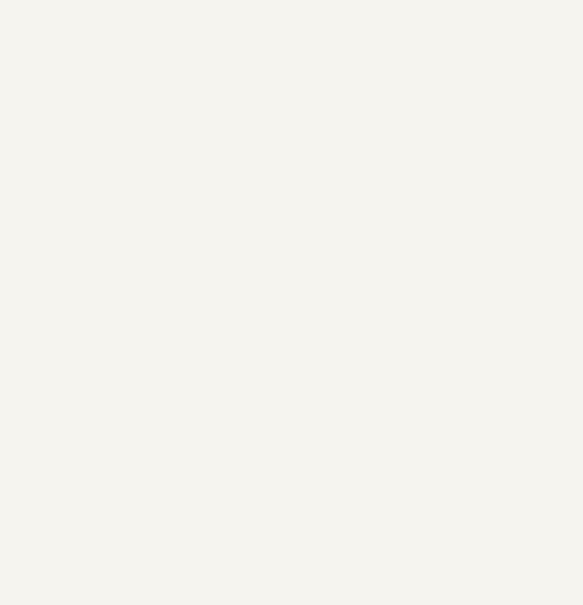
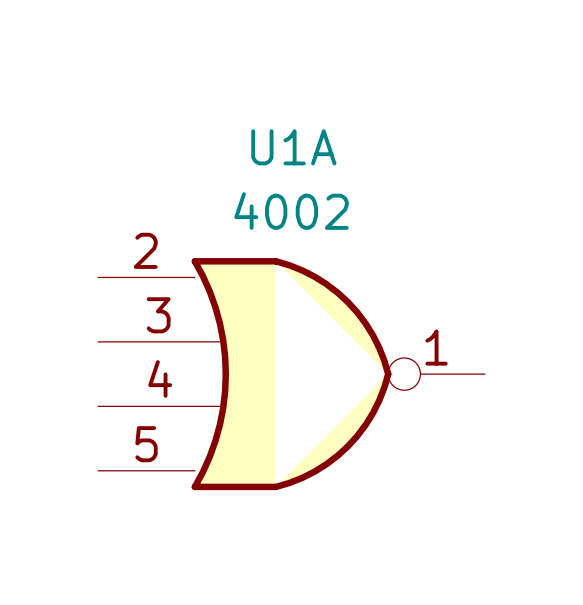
U1A: none -> 4002 (291, 374)

